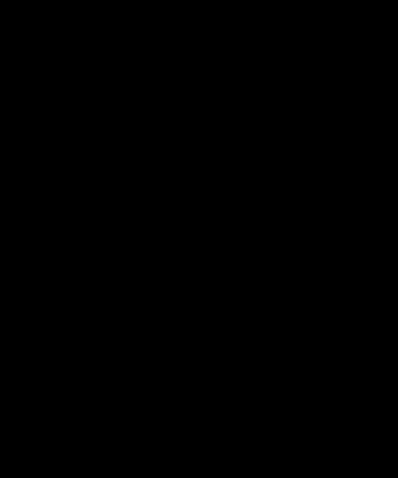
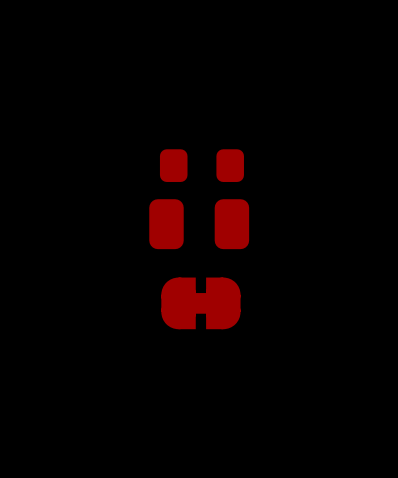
part: none -> (201, 165)
part: none -> (199, 224)
part: none -> (200, 303)

